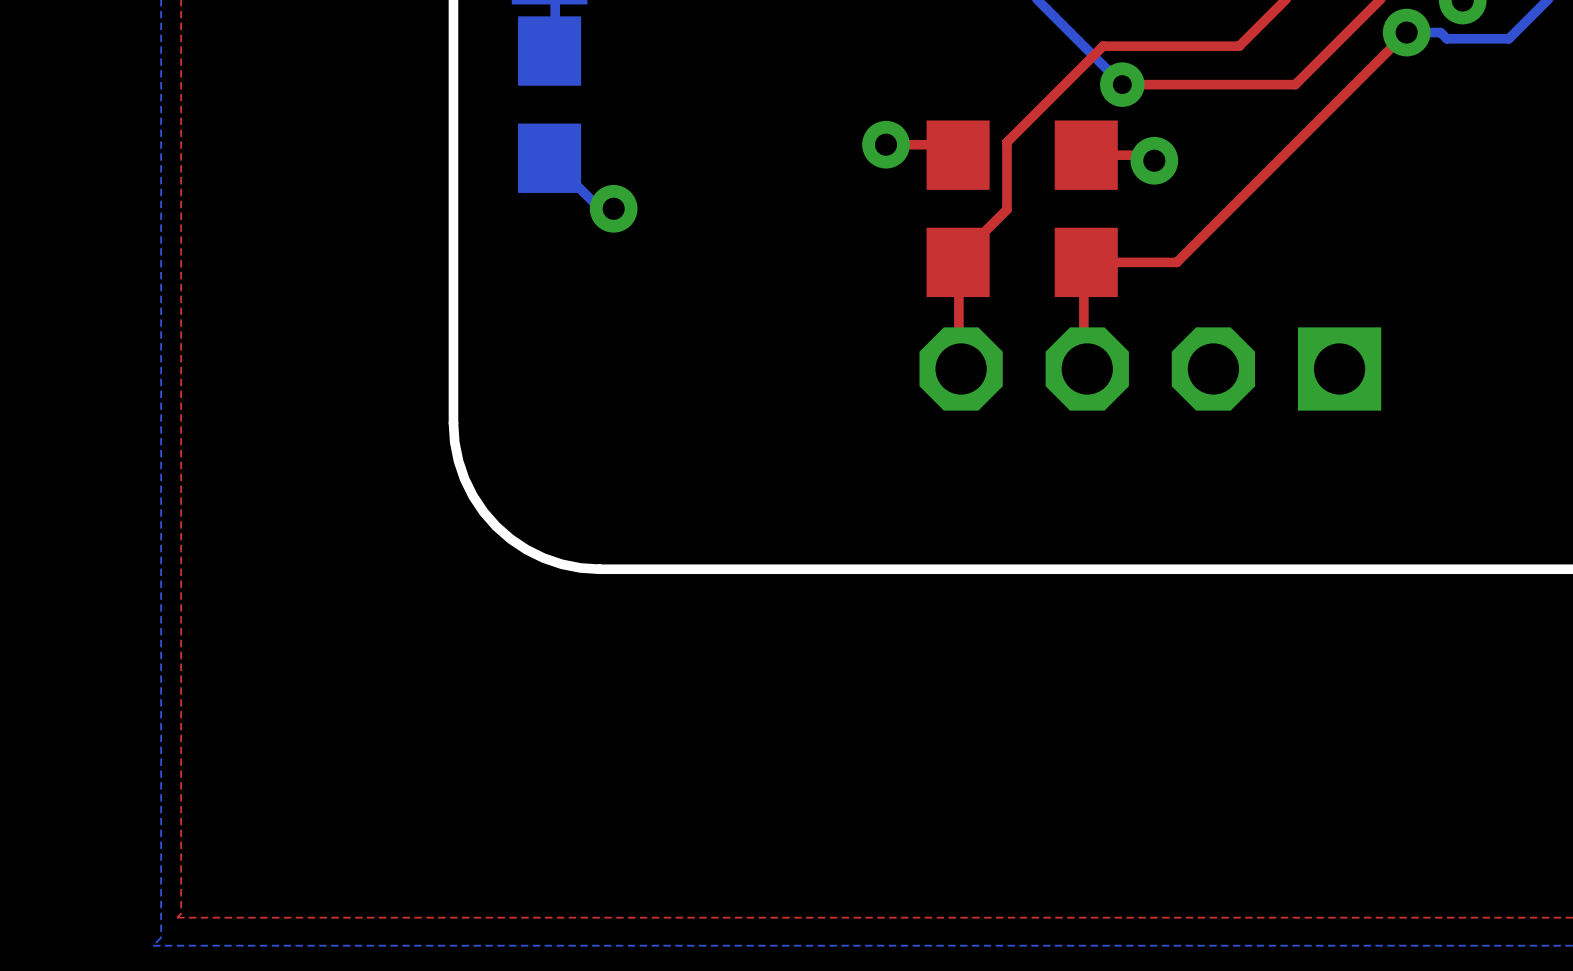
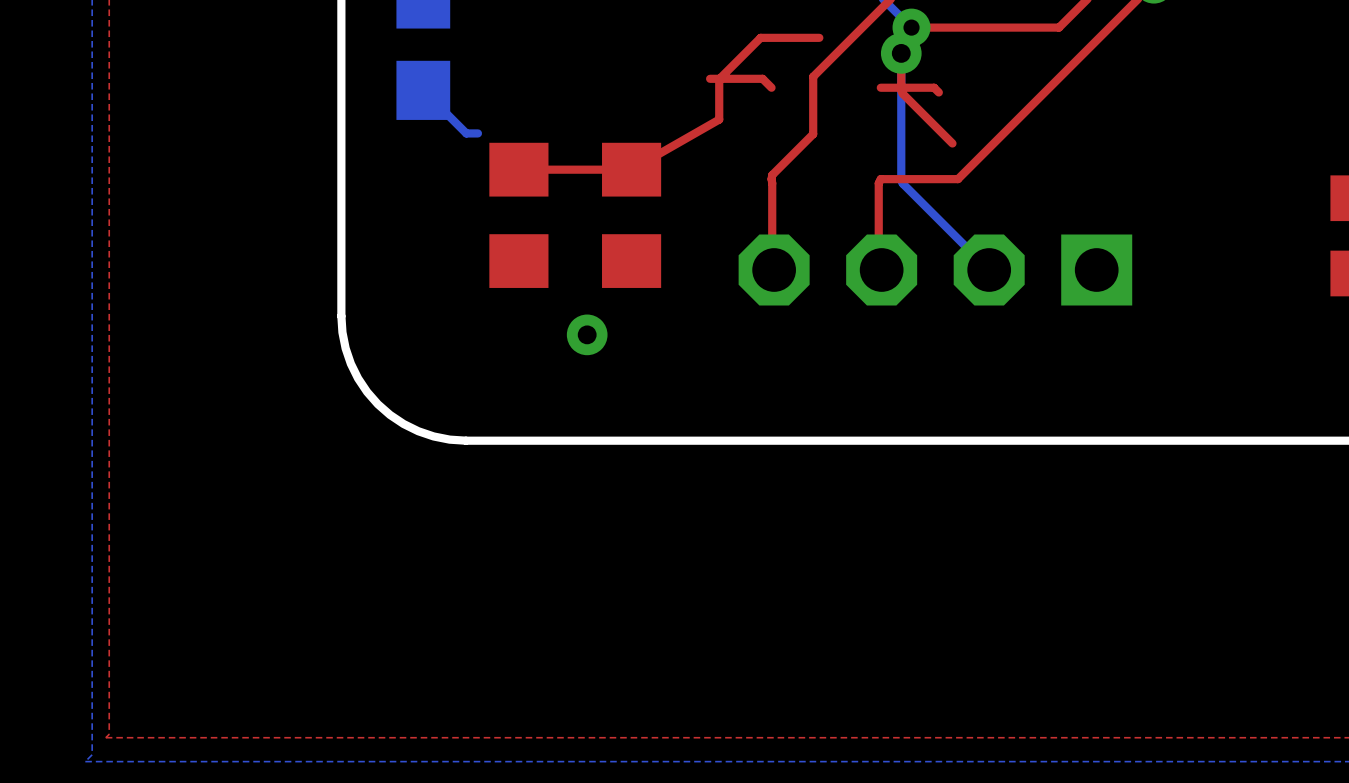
top track: none -> (819, 37) (760, 37) (719, 79) (719, 119) (631, 169) (518, 169)
bottom track: none -> (901, 53) (901, 181) (989, 270)
top track: none -> (901, 53) (902, 92) (952, 143)
via: (886, 144) -> none
via position: (1154, 160) -> (901, 53)
via: (613, 208) -> none
part: (958, 208) -> none
part: (1086, 208) -> none
part: none -> (518, 215)
part: none -> (631, 215)
via: none -> (587, 334)

